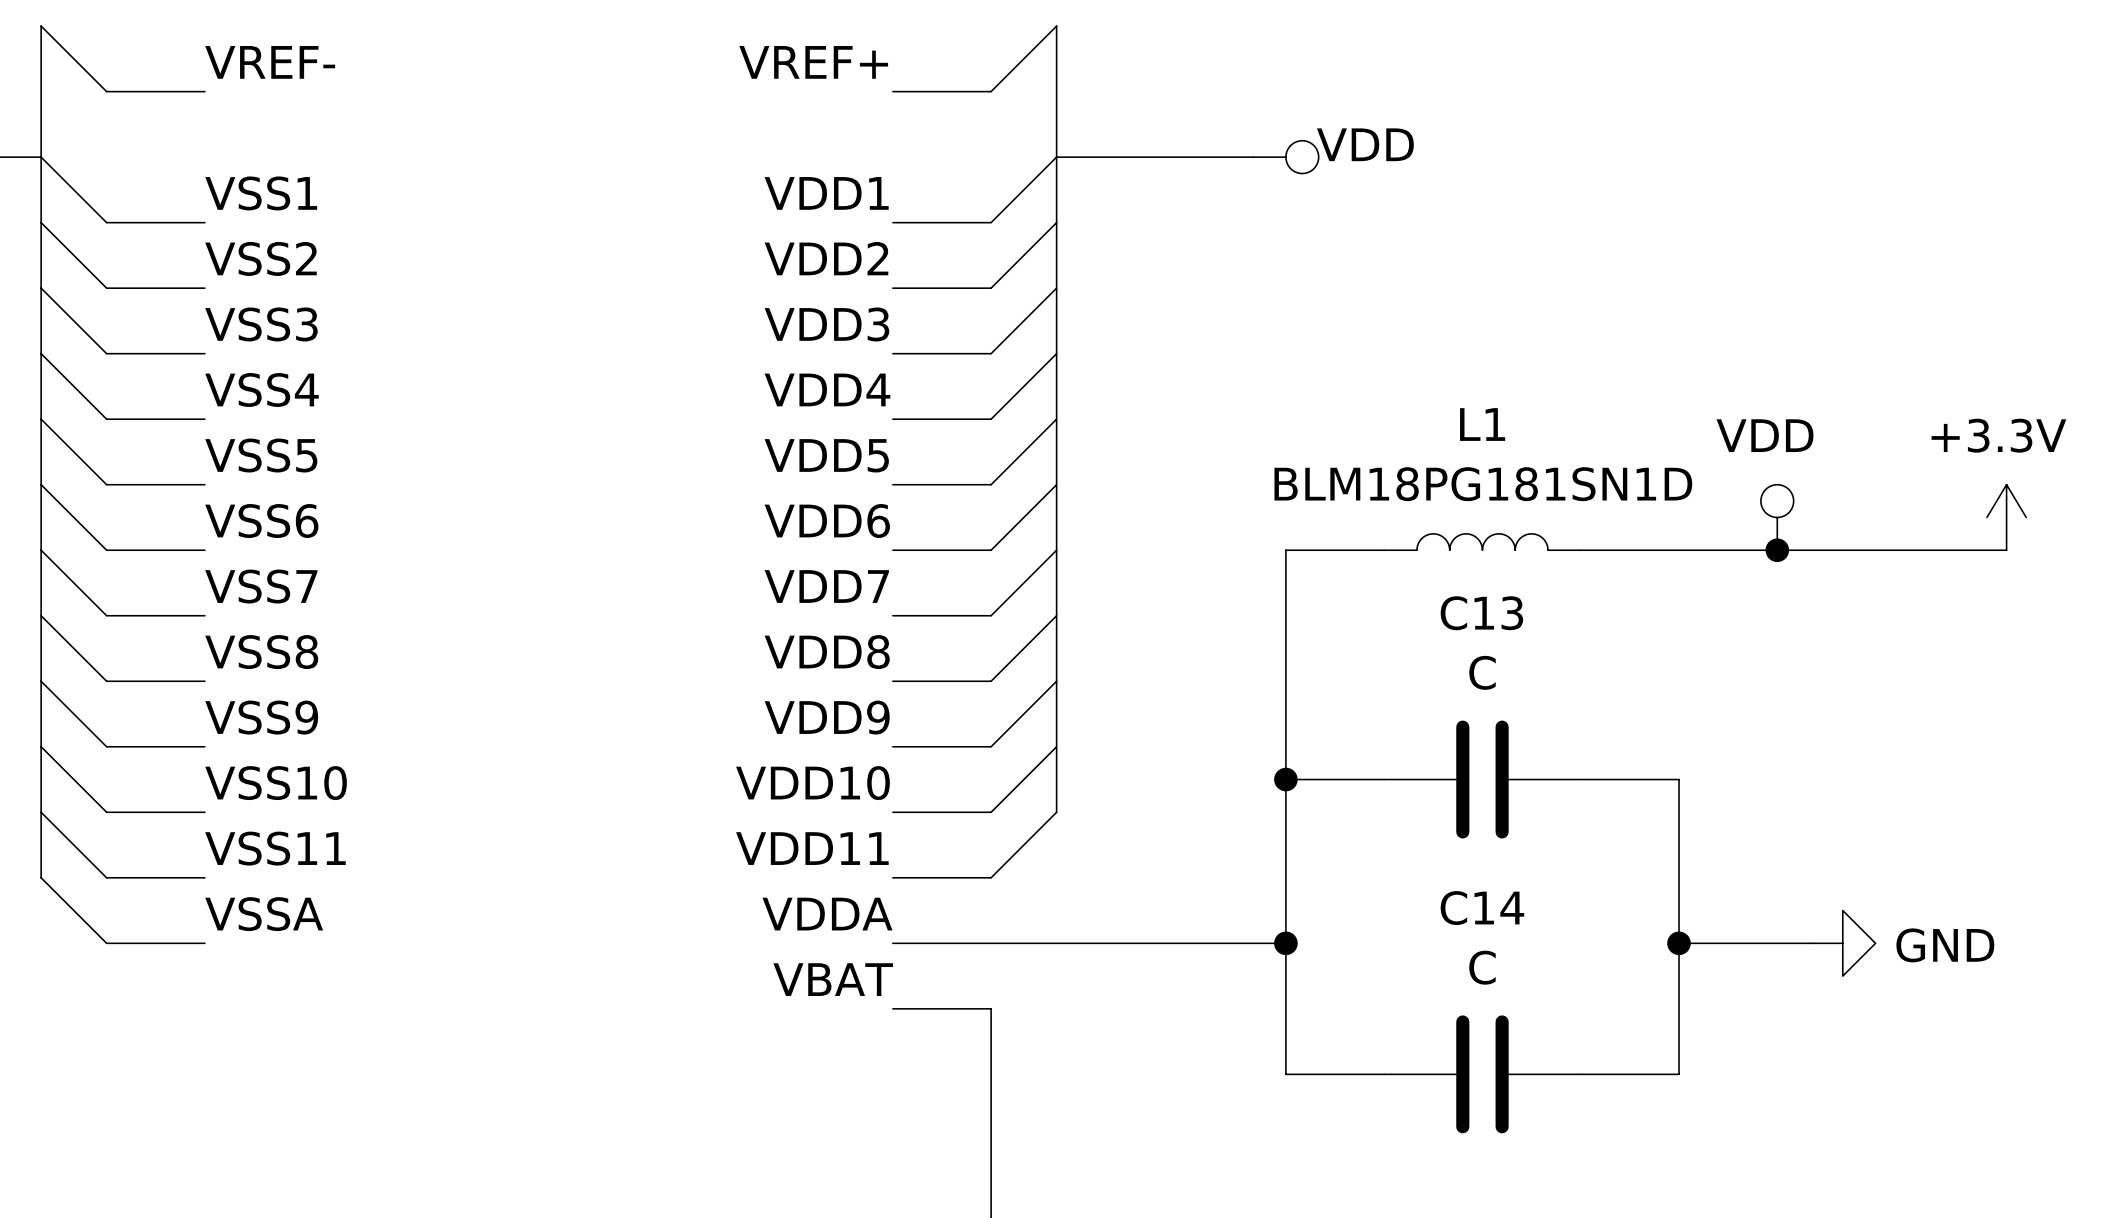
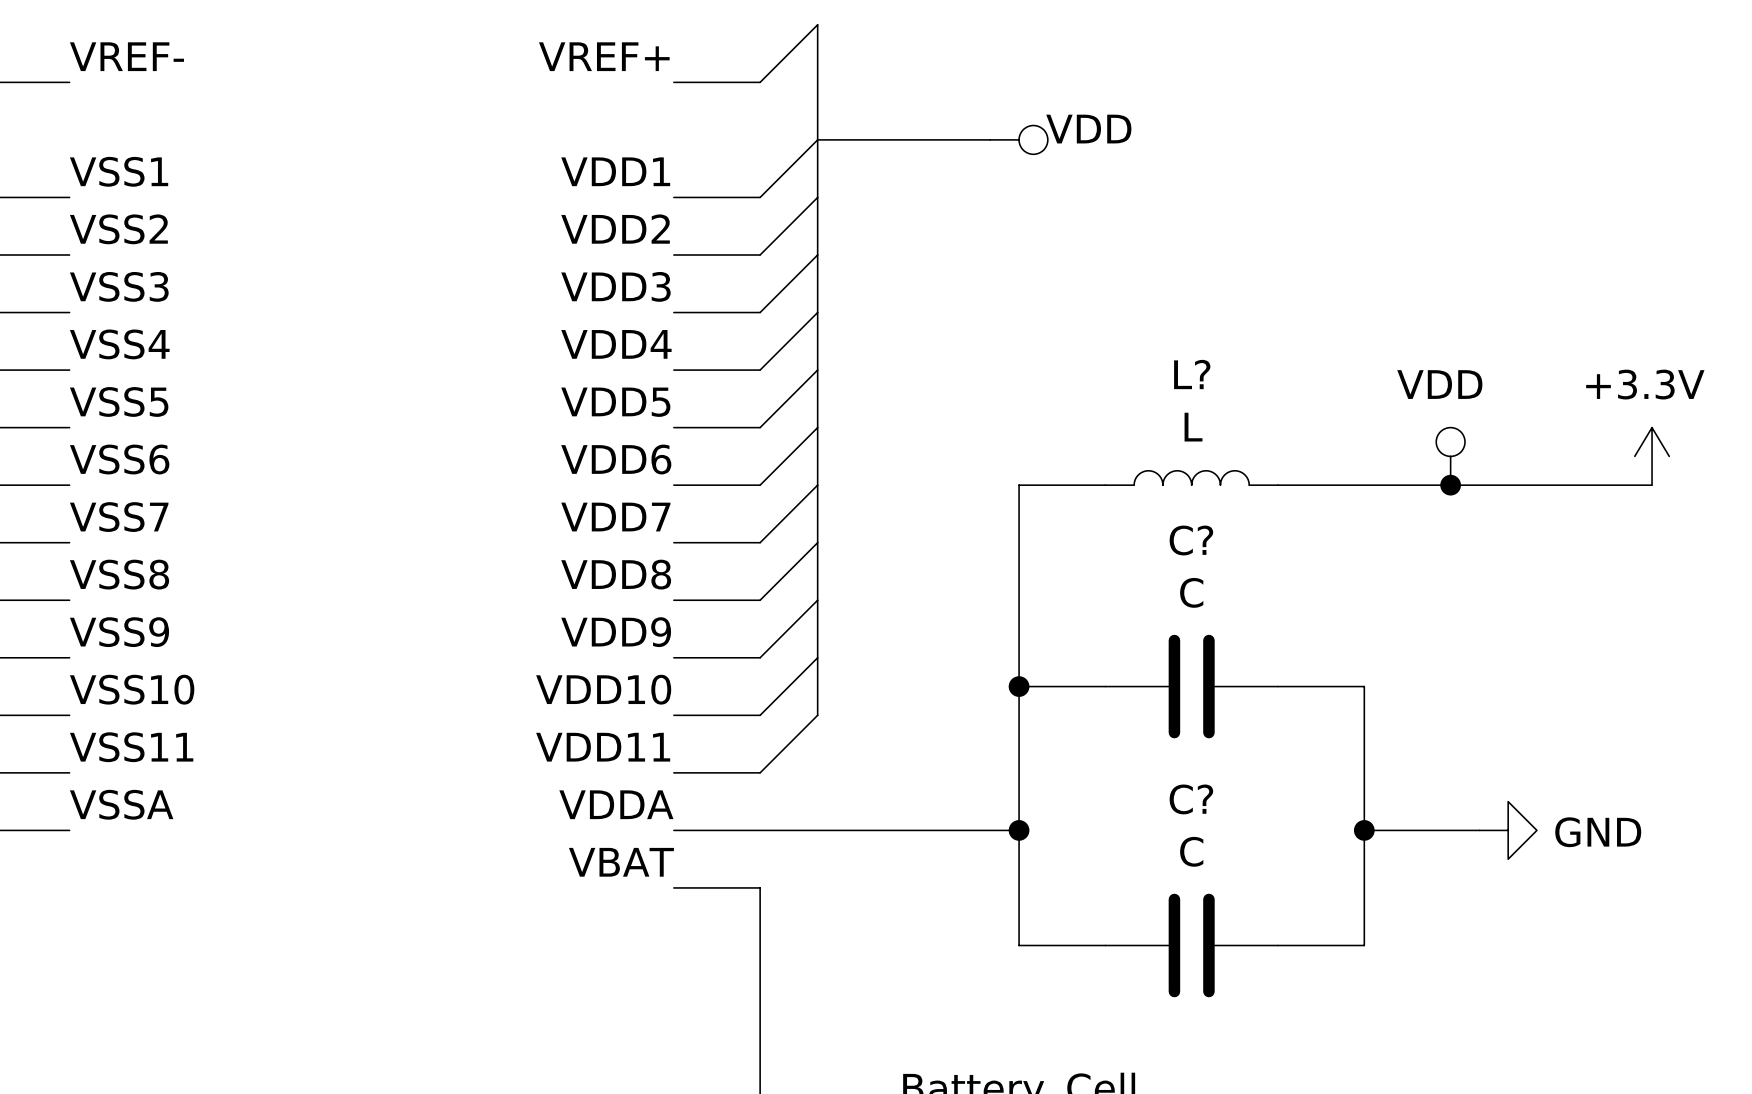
L1 name: L1 (1482, 424) -> L? (1192, 374)
L1 value: BLM18PG181SN1D (1483, 484) -> L (1193, 427)
C13 name: C13 (1481, 613) -> C? (1191, 540)
C14 name: C14 (1482, 908) -> C? (1191, 799)

